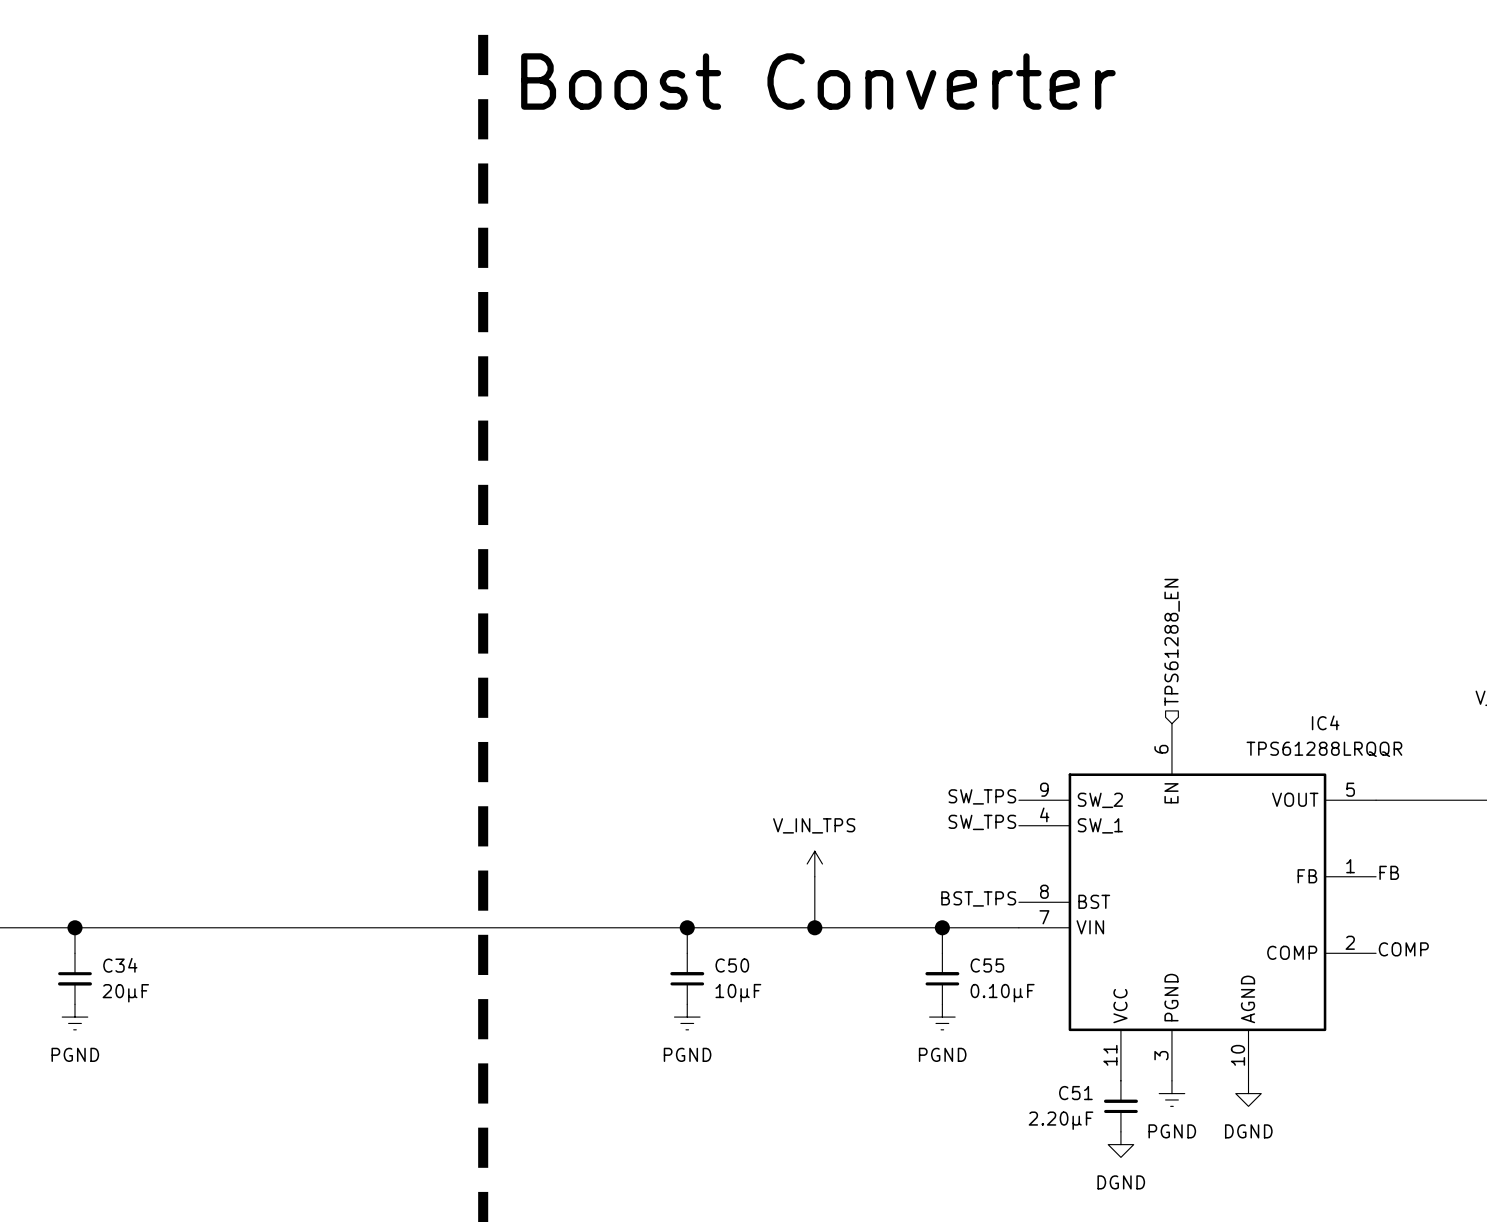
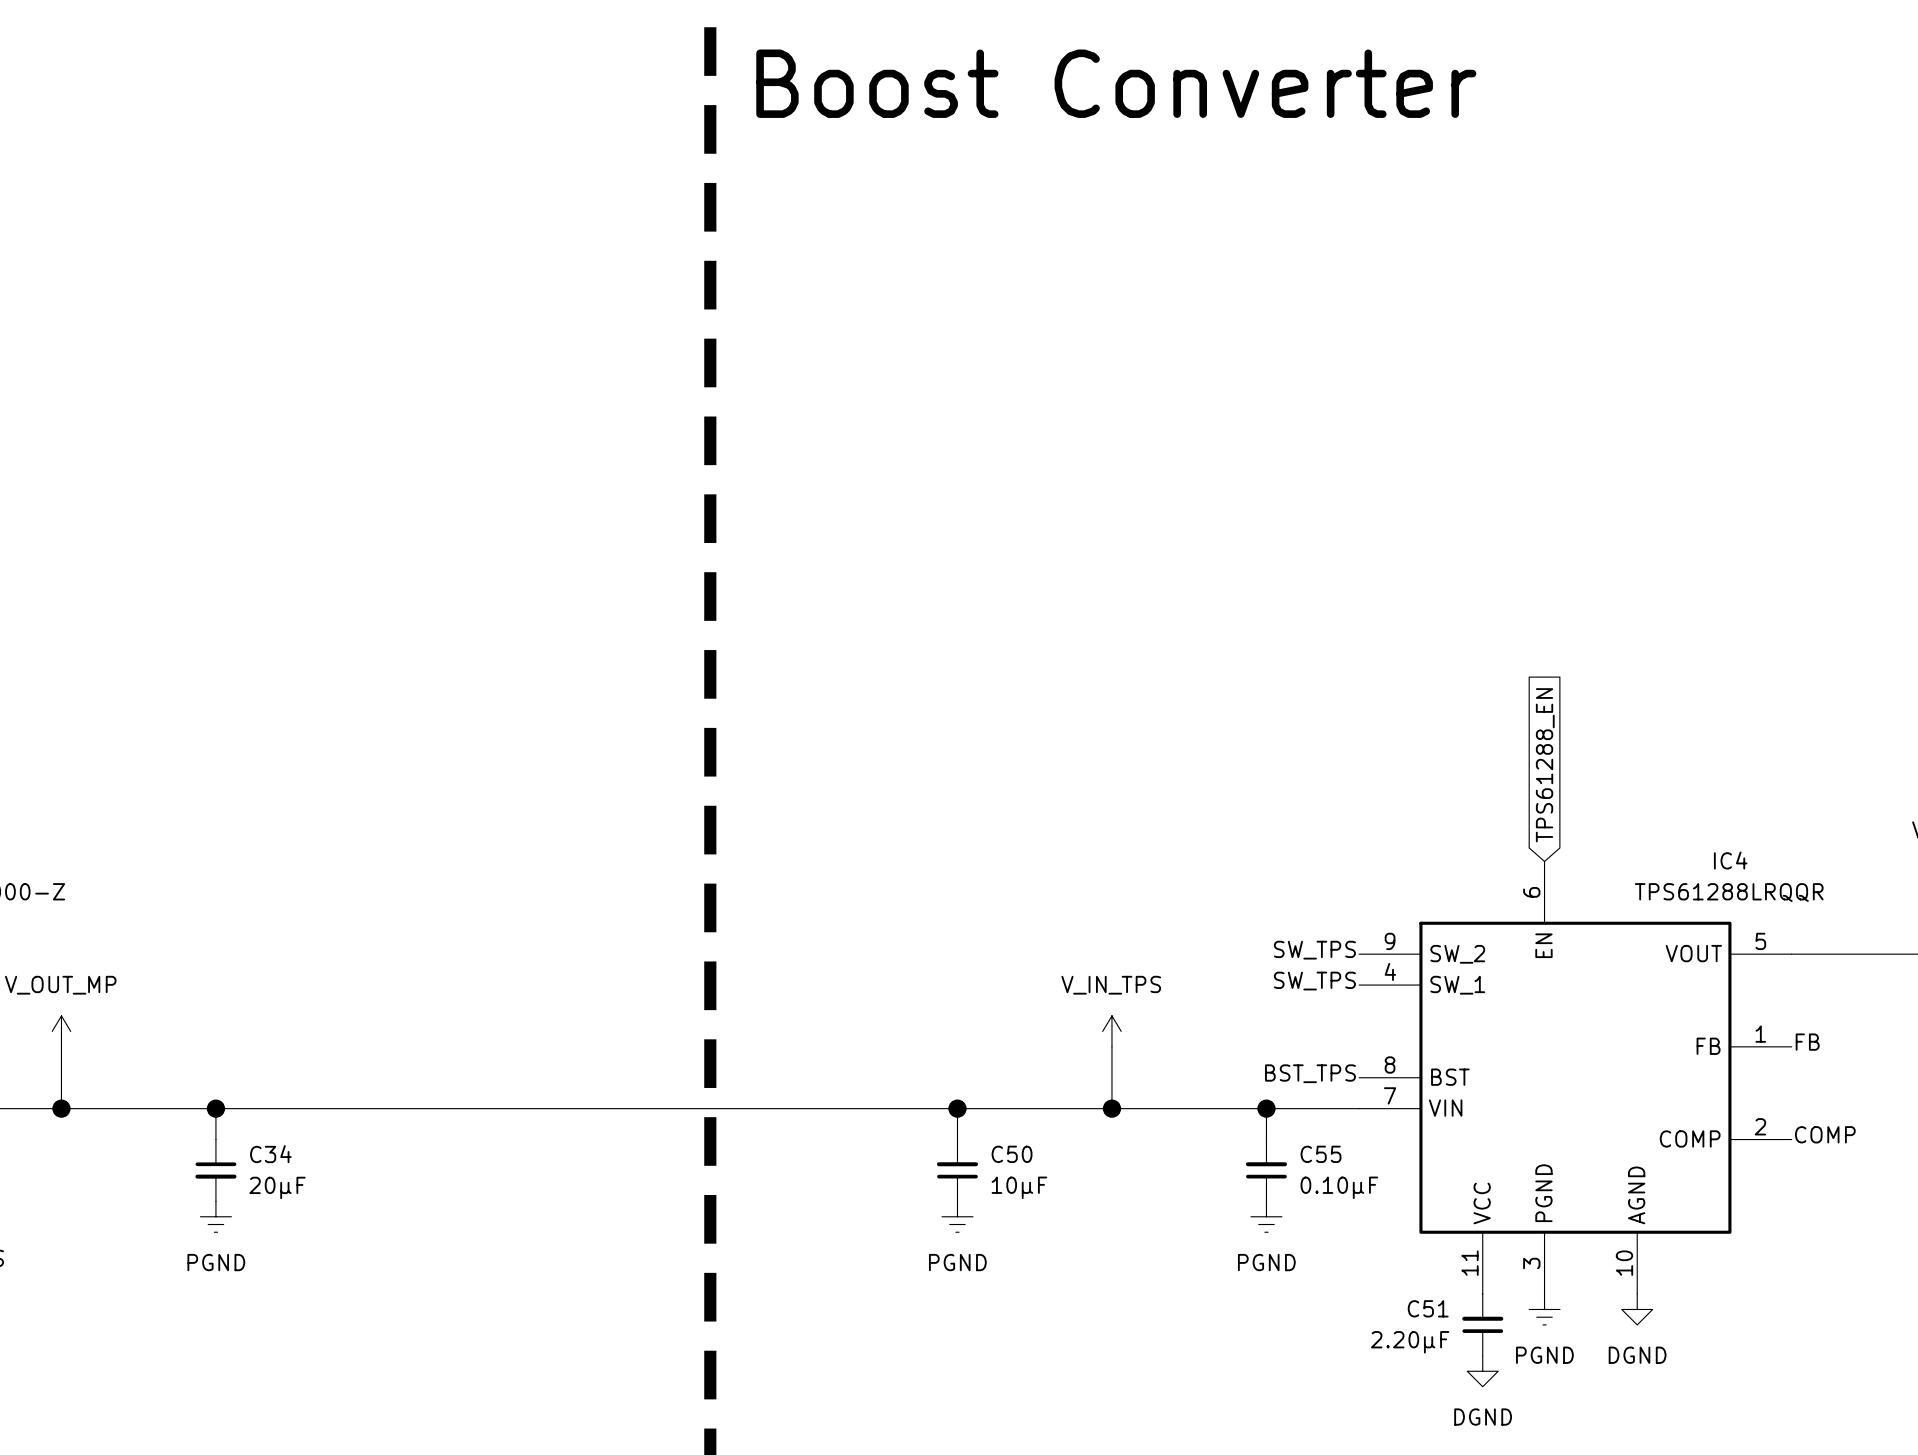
hierarchical label: TPS61288_EN (1172, 642) -> none
global label: none -> TPS61288_EN (1545, 765)

